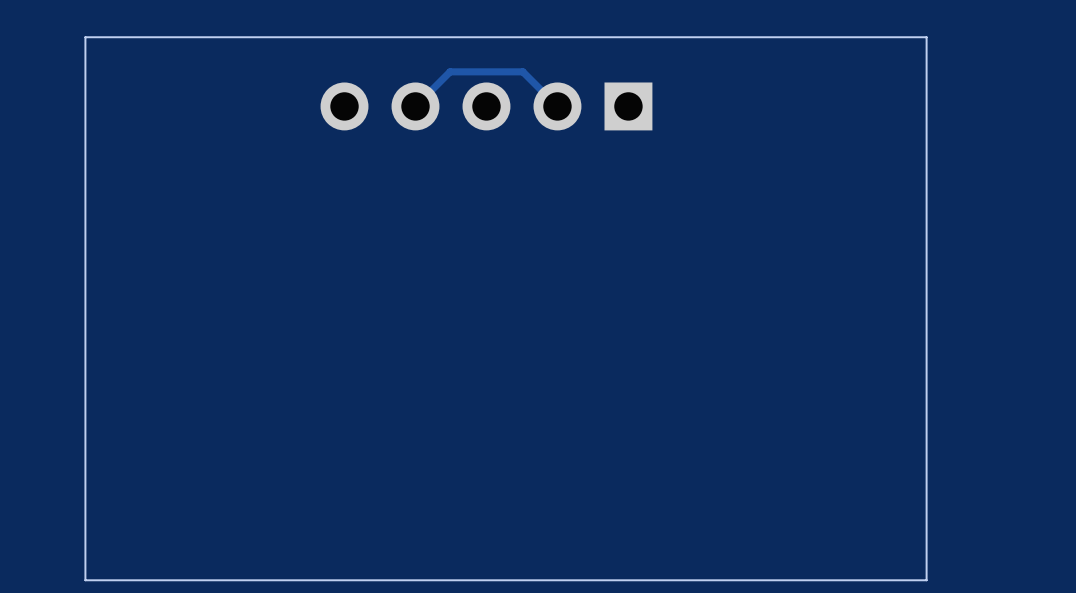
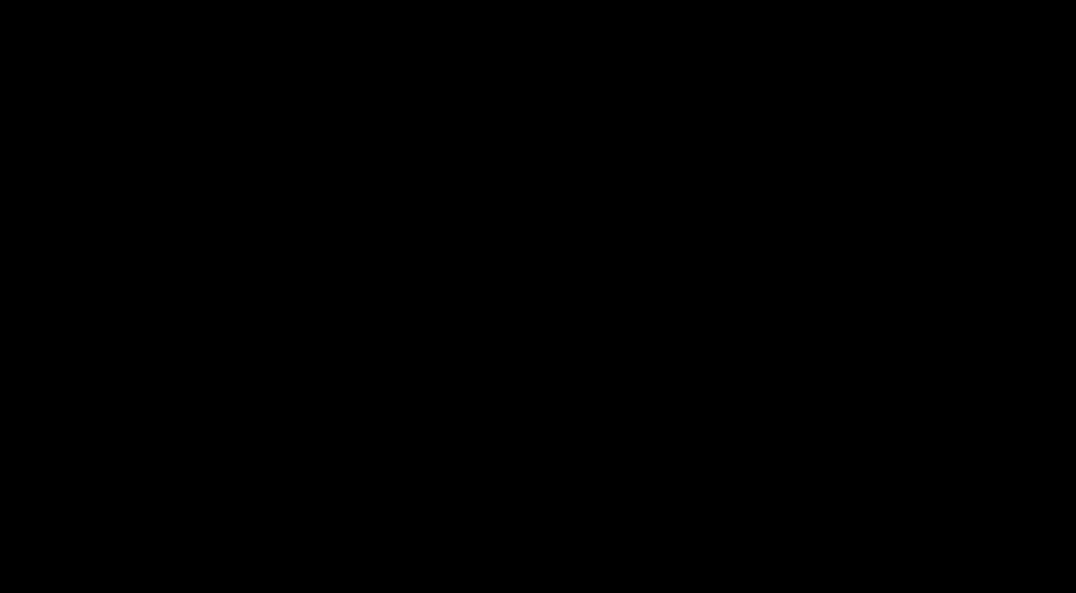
board edge: (926, 37) (85, 37) (85, 580) (926, 580) (926, 37) -> none
part: (486, 106) -> none
track: (557, 106) (522, 71) (450, 71) (415, 106) -> none

